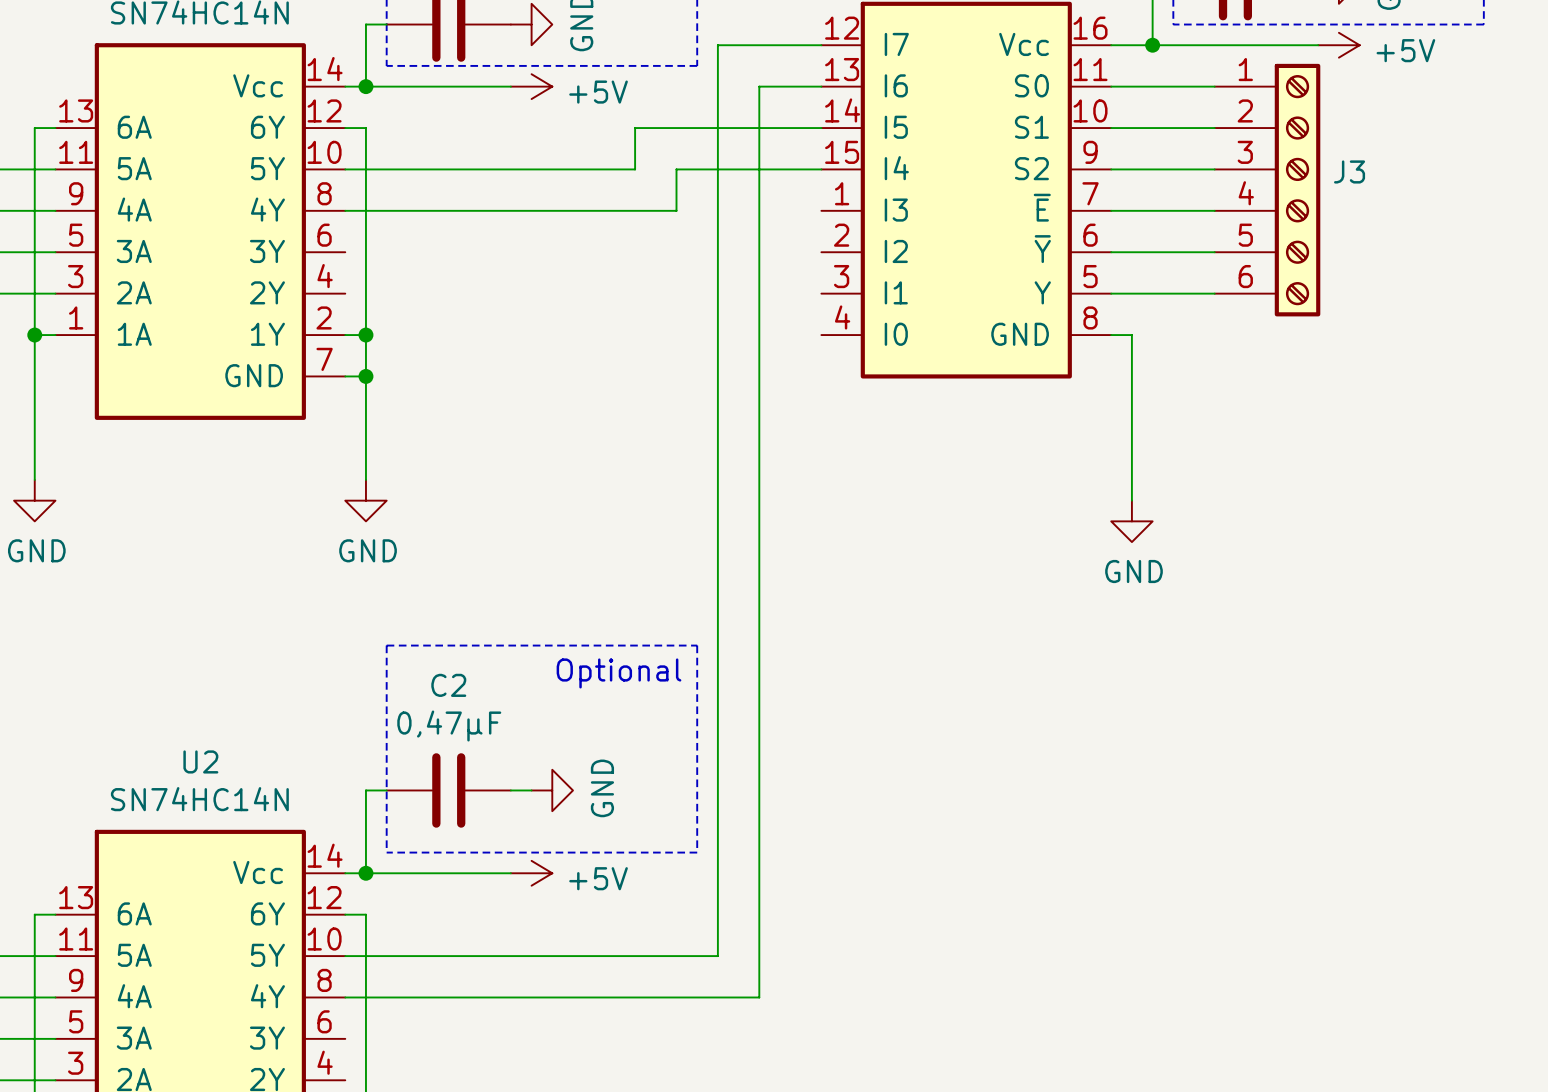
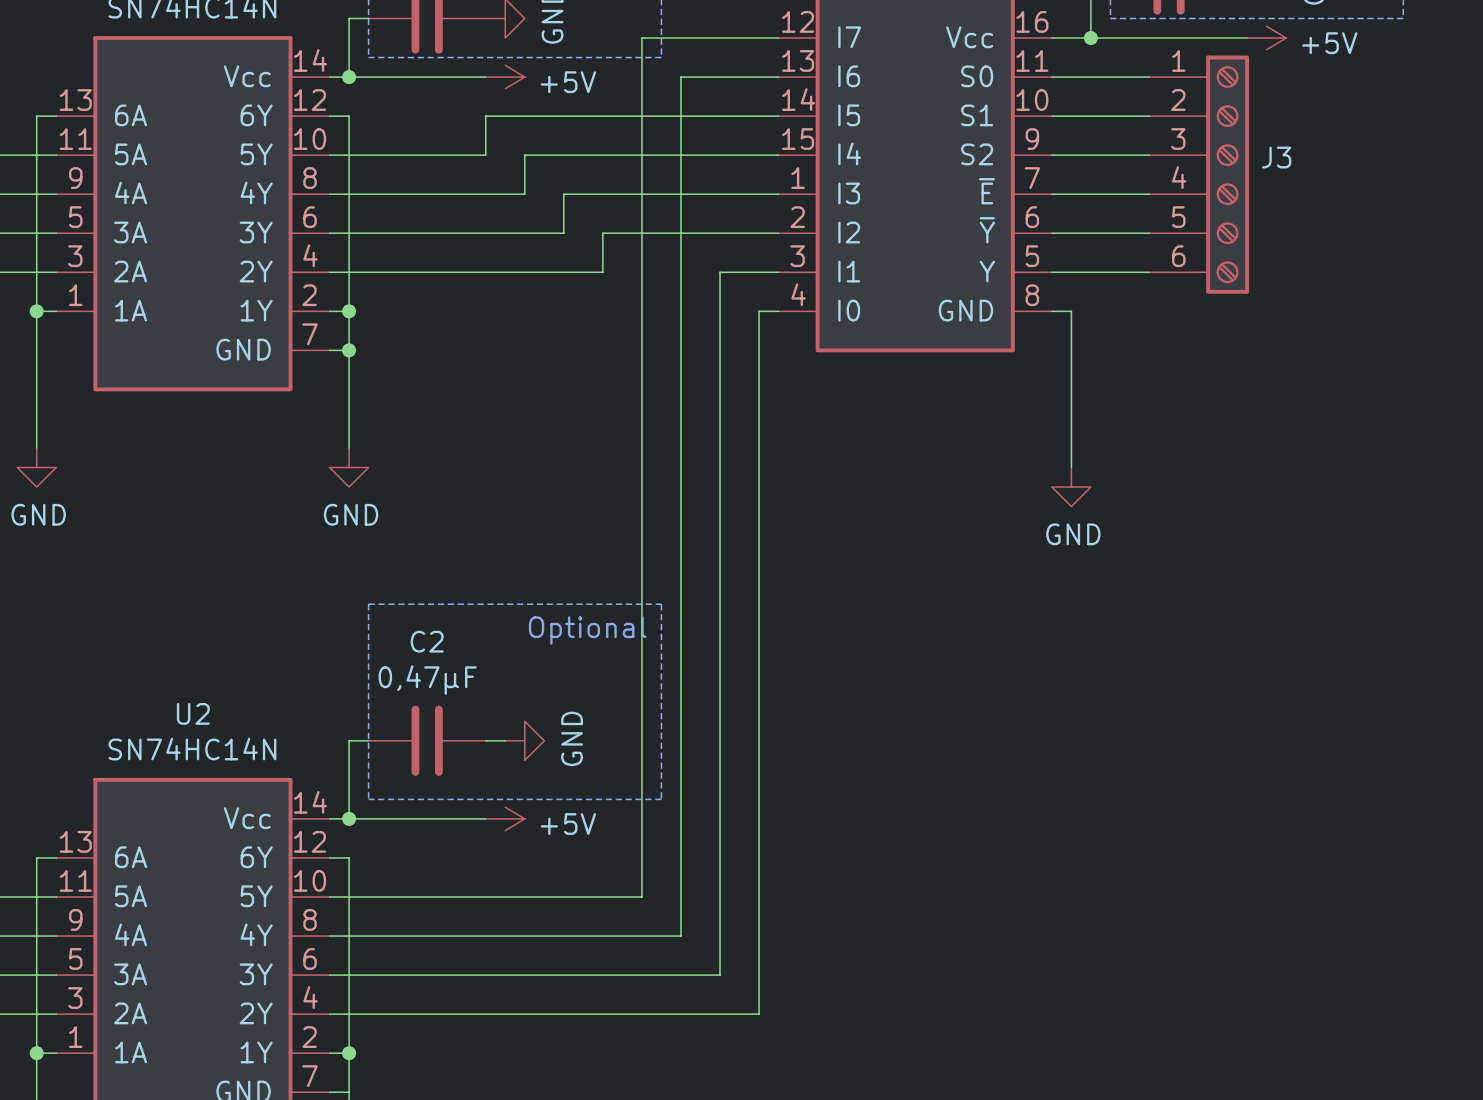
wire: (717, 45) (717, 86) -> (720, 77) (680, 77)
wire: (759, 86) (759, 293) -> (778, 272) (720, 272)
wire: (635, 128) (635, 169) -> (680, 38) (641, 38) (641, 155) (602, 155)
wire: (510, 169) (552, 169) -> (485, 155) (485, 116) (602, 116)
wire: (552, 210) (593, 210) -> (524, 194) (524, 155)
wire: none -> (563, 194) (563, 233) (329, 233)
wire: none -> (778, 194) (641, 194) (641, 896)
wire: none -> (778, 233) (602, 233) (602, 272) (329, 272)
wire: none -> (778, 311) (759, 311) (759, 1014) (329, 1014)
wire: (676, 956) (717, 956) -> (680, 936) (680, 896)
wire: (717, 997) (759, 997) -> (329, 975) (720, 975) (720, 936)

